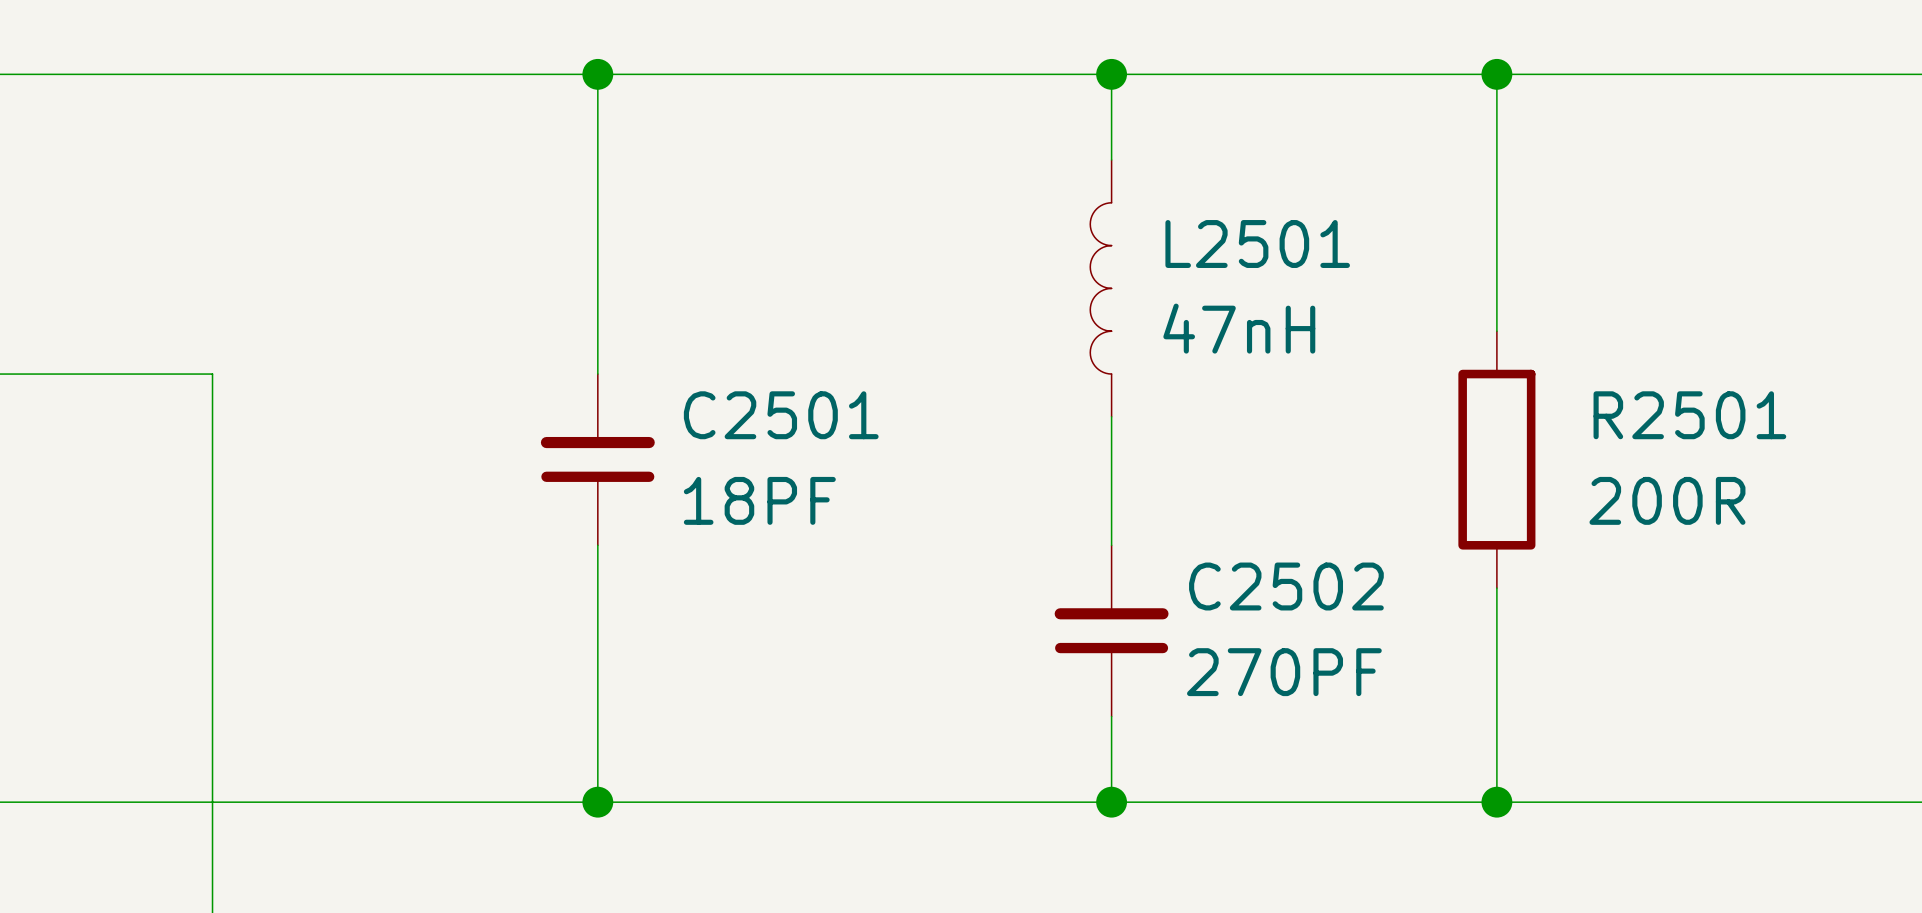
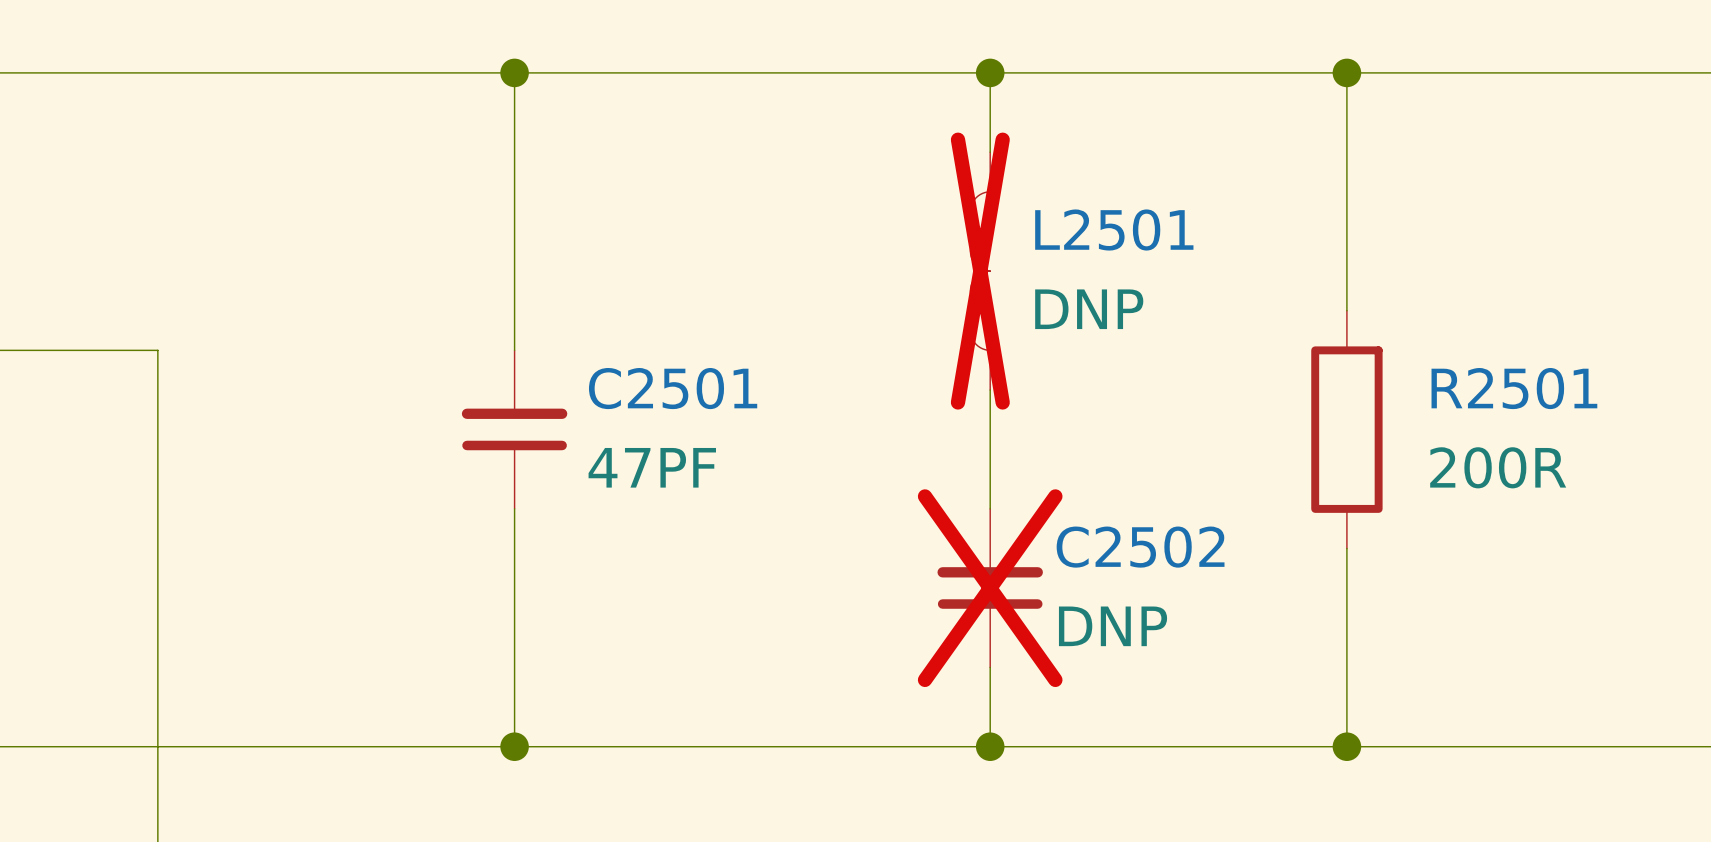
L2501 do-not-place cross: none -> (980, 271)
L2501 value: 47nH (1239, 328) -> DNP (1089, 309)
C2501 value: 18PF (759, 500) -> 47PF (652, 467)
C2502 do-not-place cross: none -> (990, 588)
C2502 value: 270PF (1284, 672) -> DNP (1113, 626)

